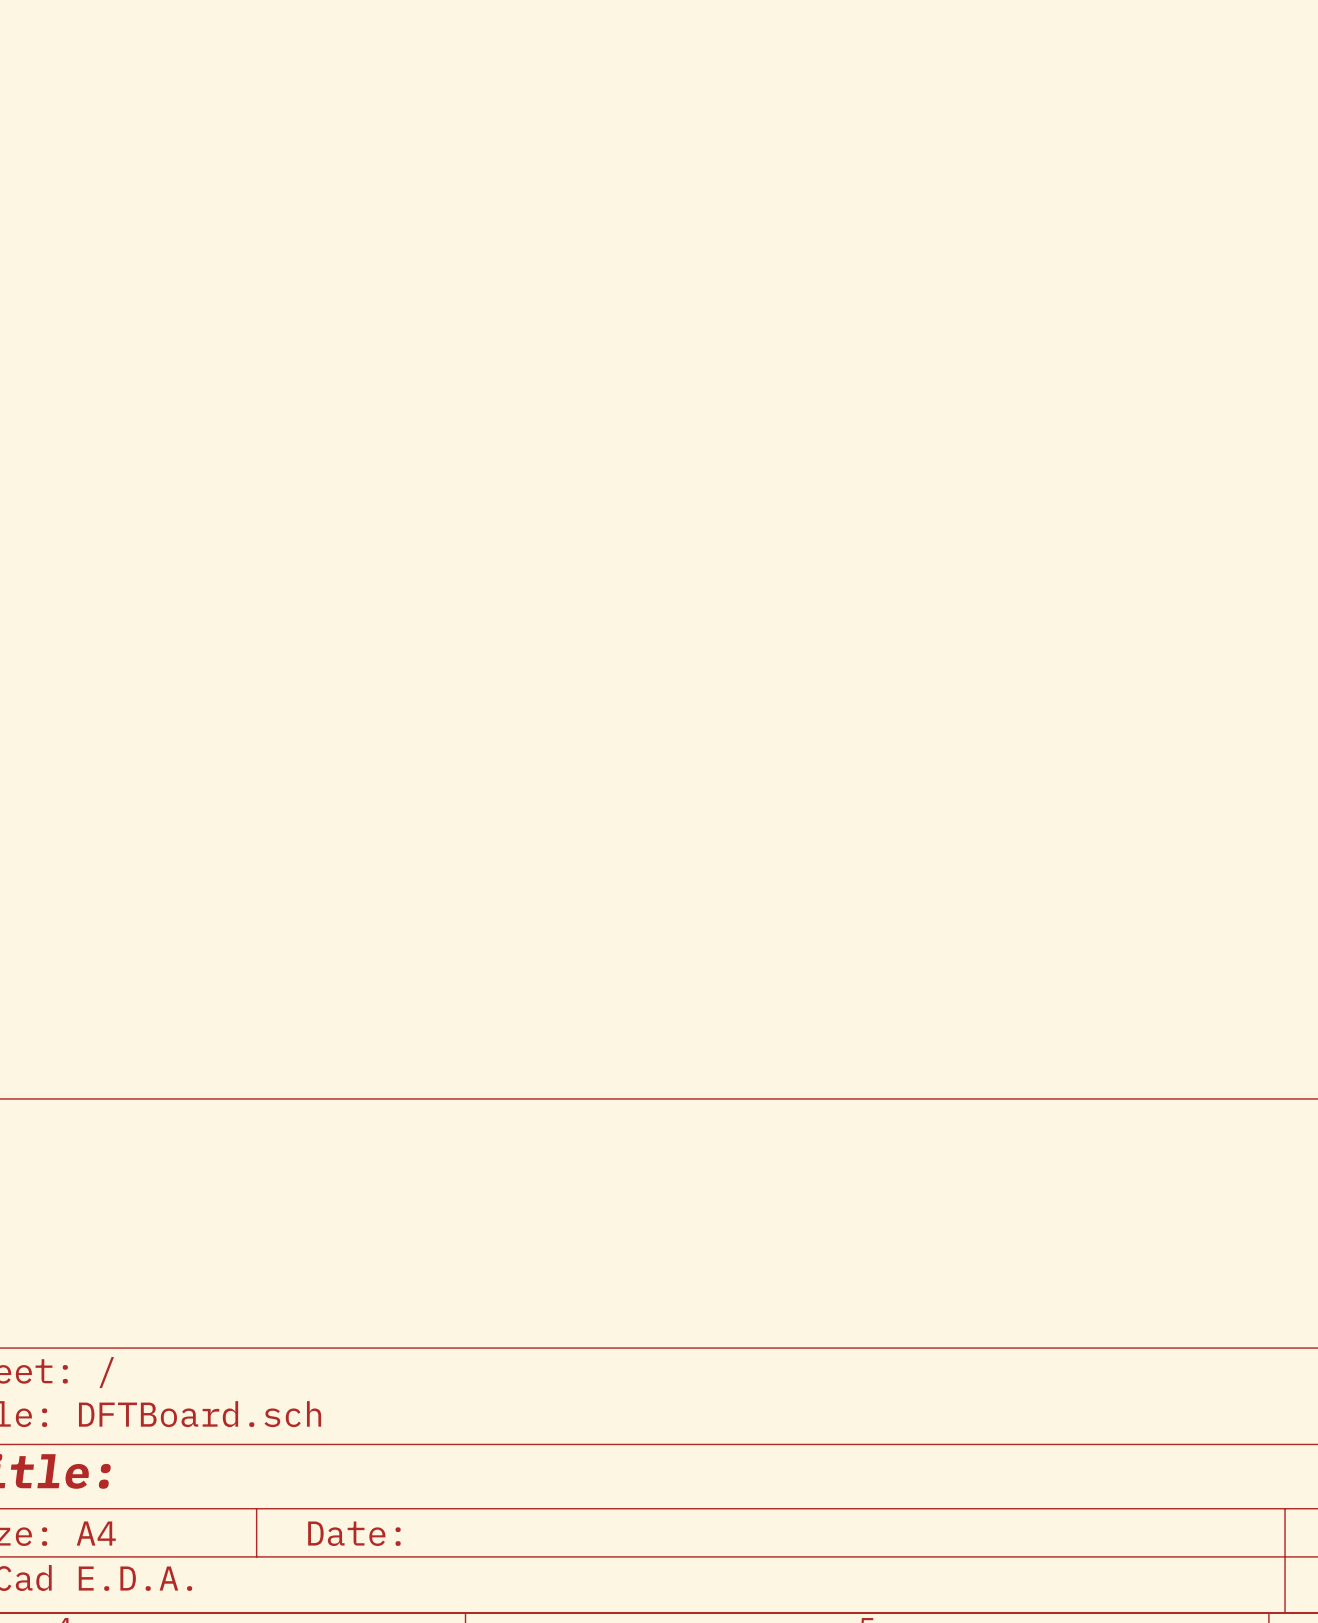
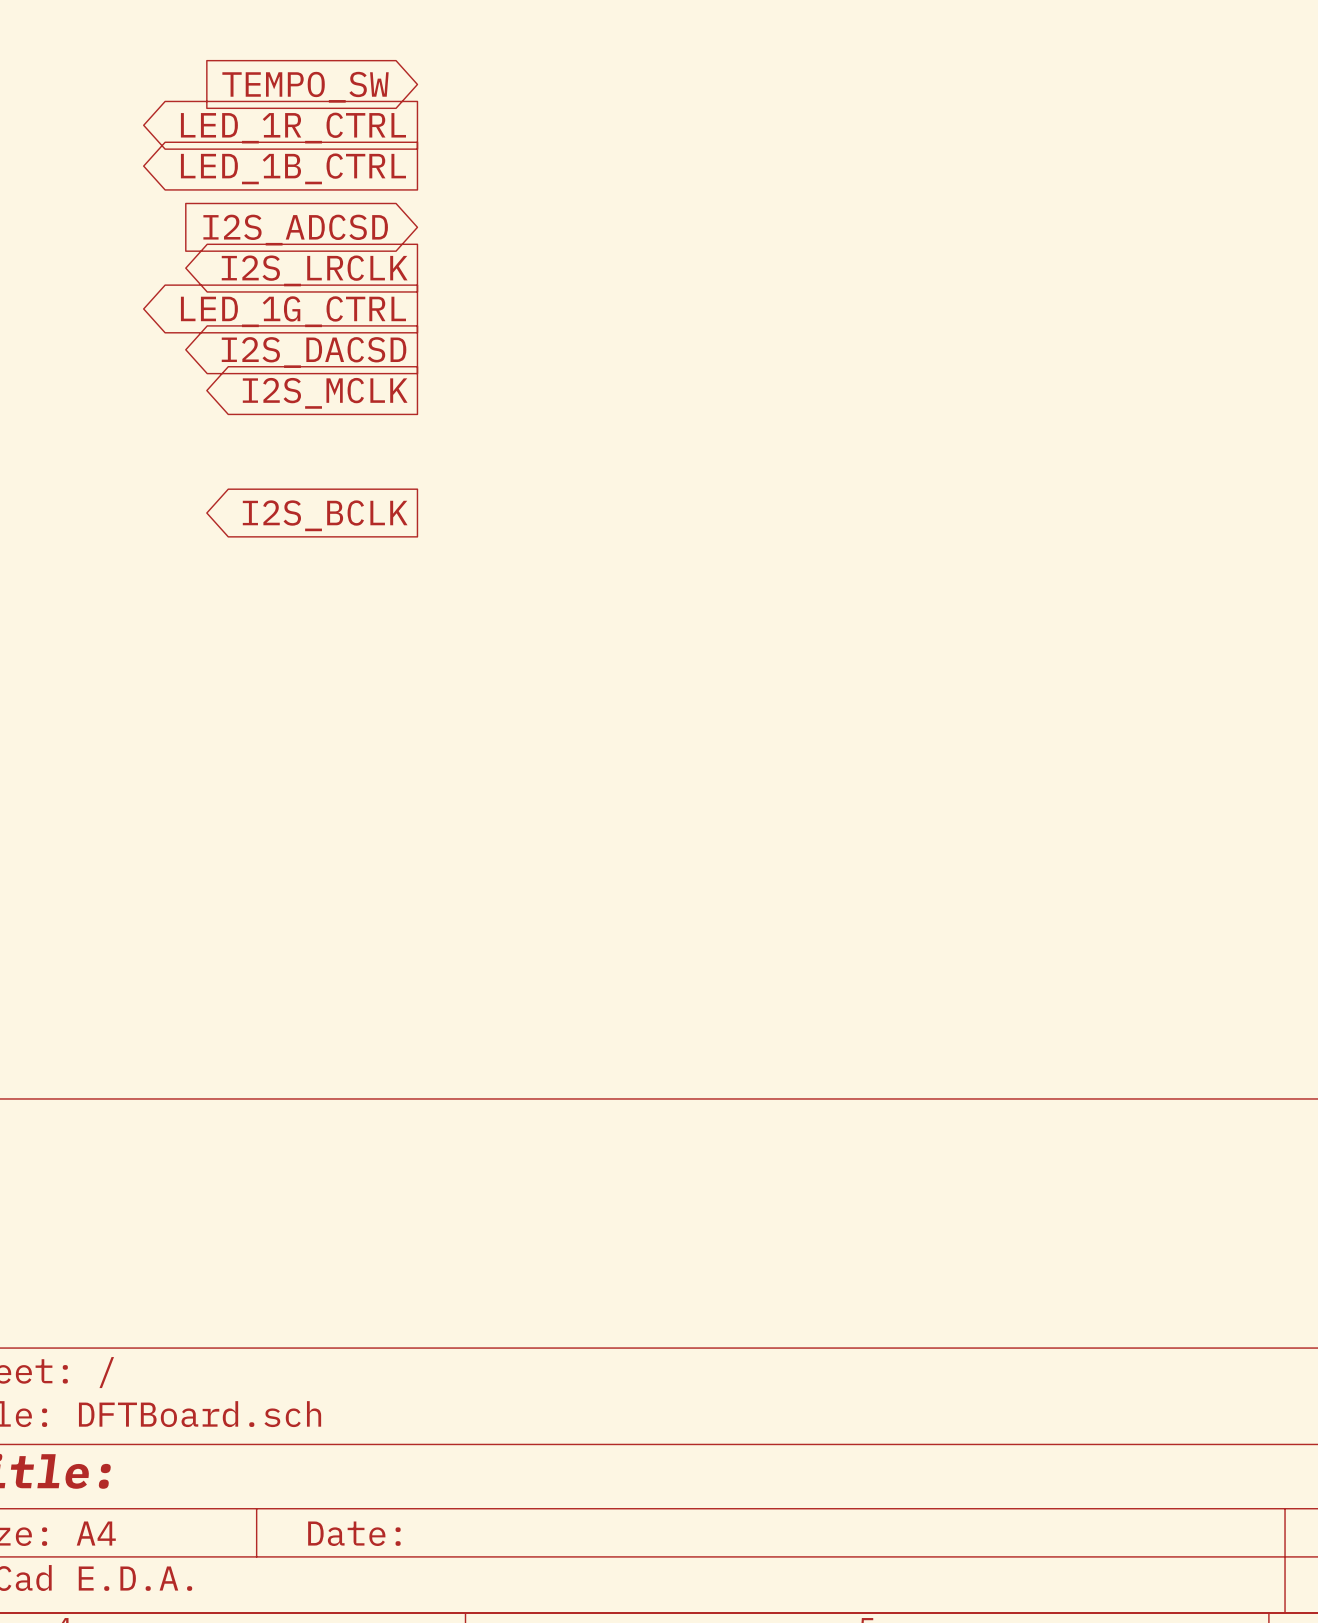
global label: none -> TEMPO_SW (305, 87)
global label: none -> LED_1R_CTRL (293, 128)
global label: none -> LED_1B_CTRL (293, 168)
global label: none -> I2S_ADCSD (295, 230)
global label: none -> I2S_LRCLK (314, 270)
global label: none -> LED_1G_CTRL (293, 311)
global label: none -> I2S_DACSD (314, 352)
global label: none -> I2S_MCLK (325, 393)
global label: none -> I2S_BCLK (325, 515)

